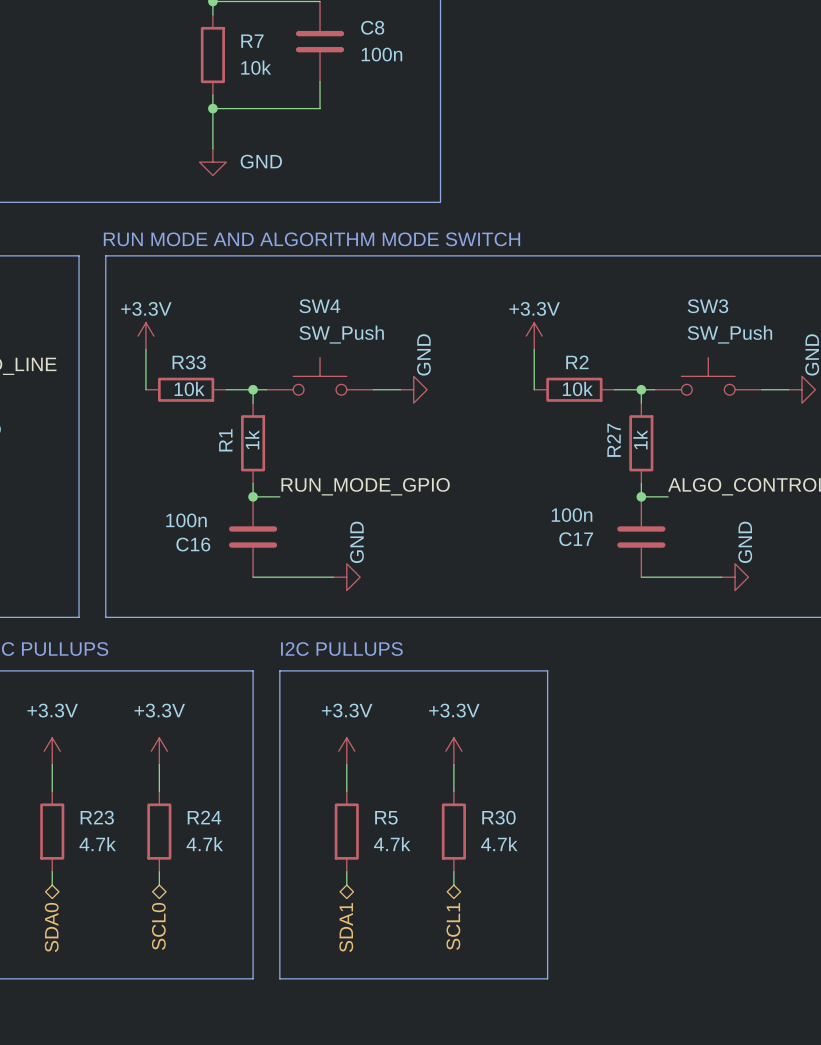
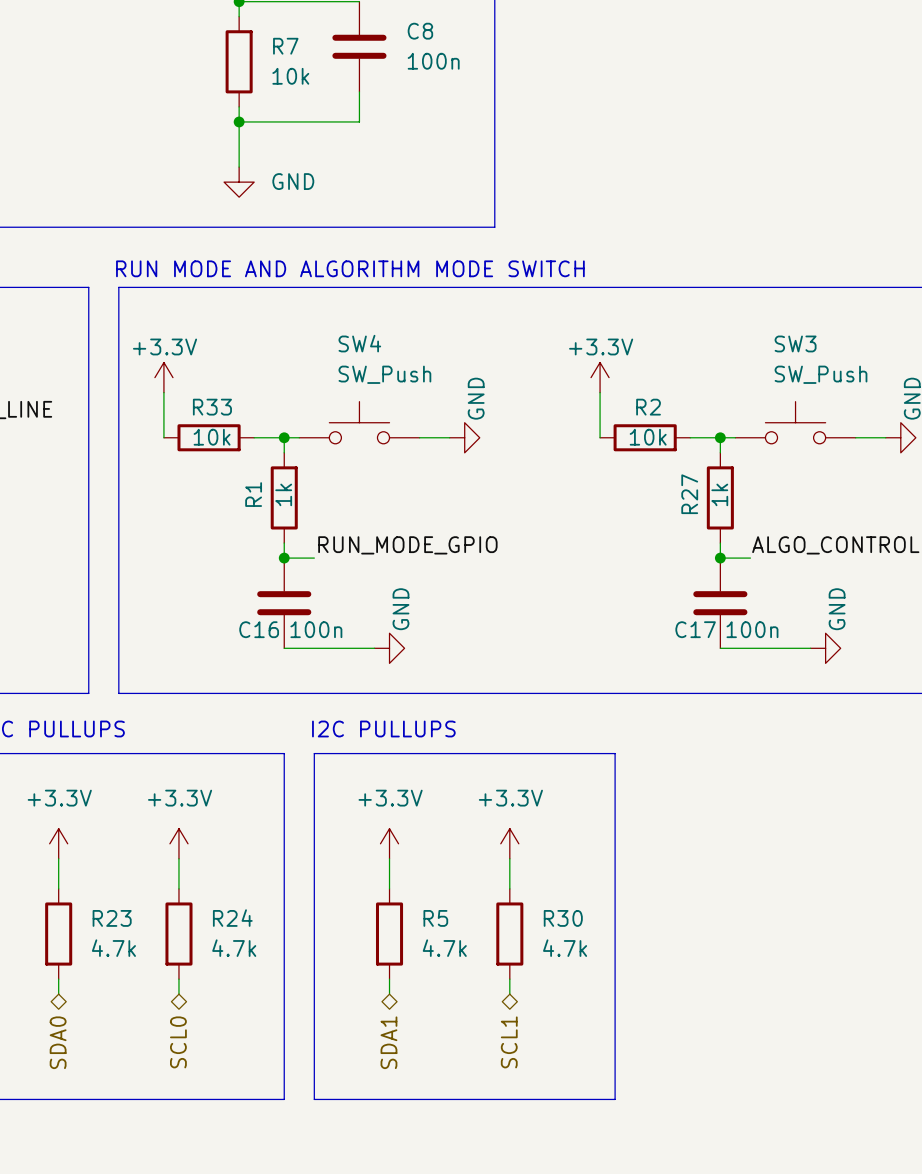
C17 value position: 100n (572, 515) -> 100n (752, 629)
C16 value position: 100n (186, 520) -> 100n (316, 629)
C17 name position: C17 (576, 539) -> C17 (695, 629)
C16 name position: C16 (193, 544) -> C16 (259, 629)

